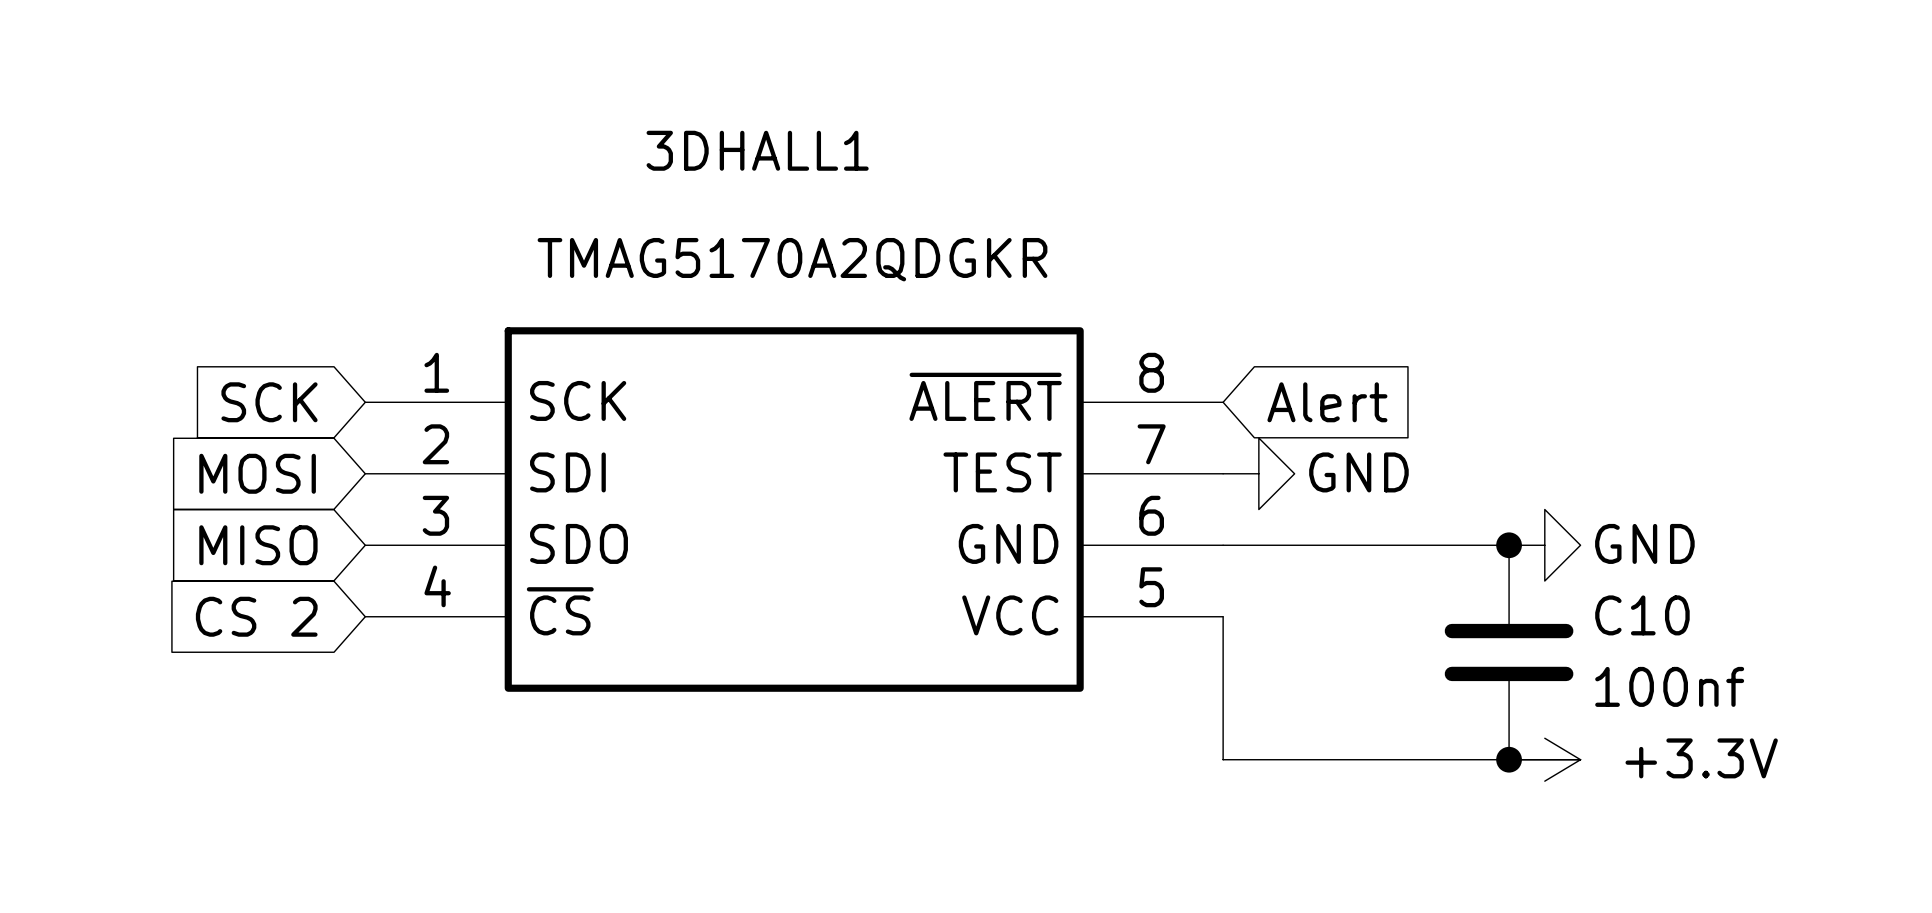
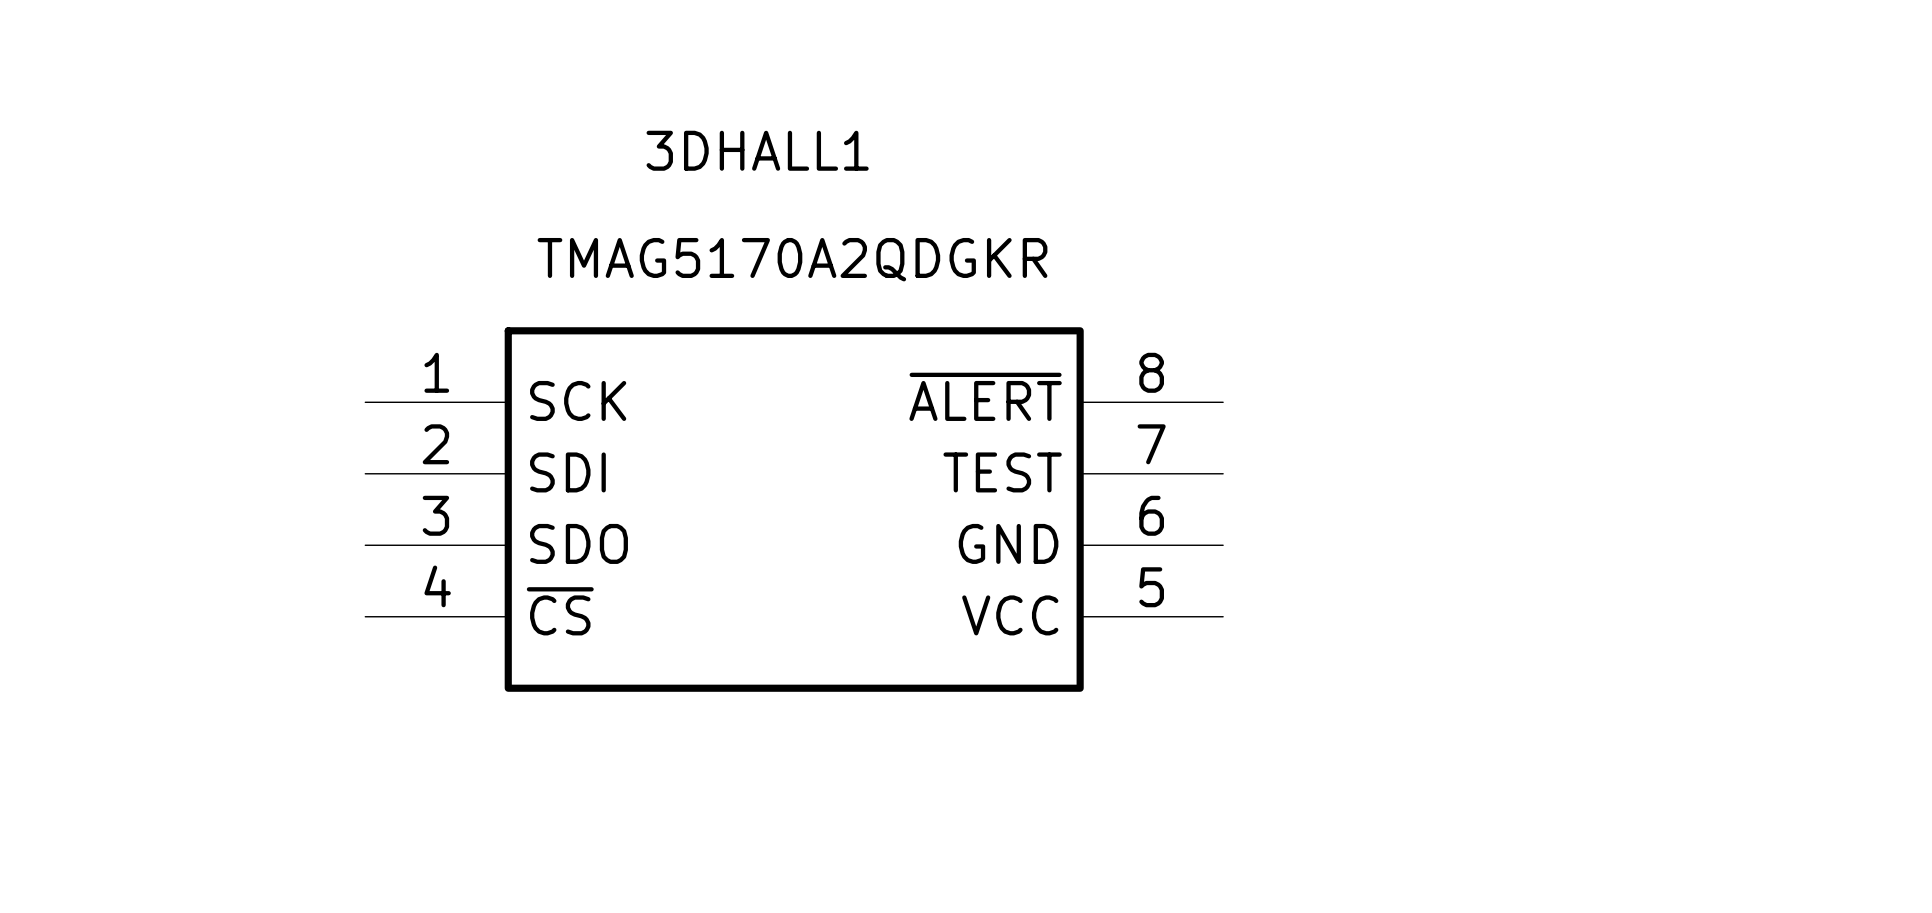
global label: SCK (269, 402) -> none
global label: Alert (1327, 402) -> none
global label: MOSI (257, 473) -> none
power symbol: GND (1258, 473) -> none
global label: MISO (258, 545) -> none
wire: (1223, 545) (1509, 545) -> none
junction: (1509, 545) -> none
power symbol: GND (1544, 545) -> none
global label: CS 2 (256, 616) -> none
wire: (1223, 616) (1223, 759) (1580, 759) -> none
C10: 100nf (1509, 652) -> none
junction: (1509, 759) -> none
power symbol: +3.3V (1544, 759) -> none

